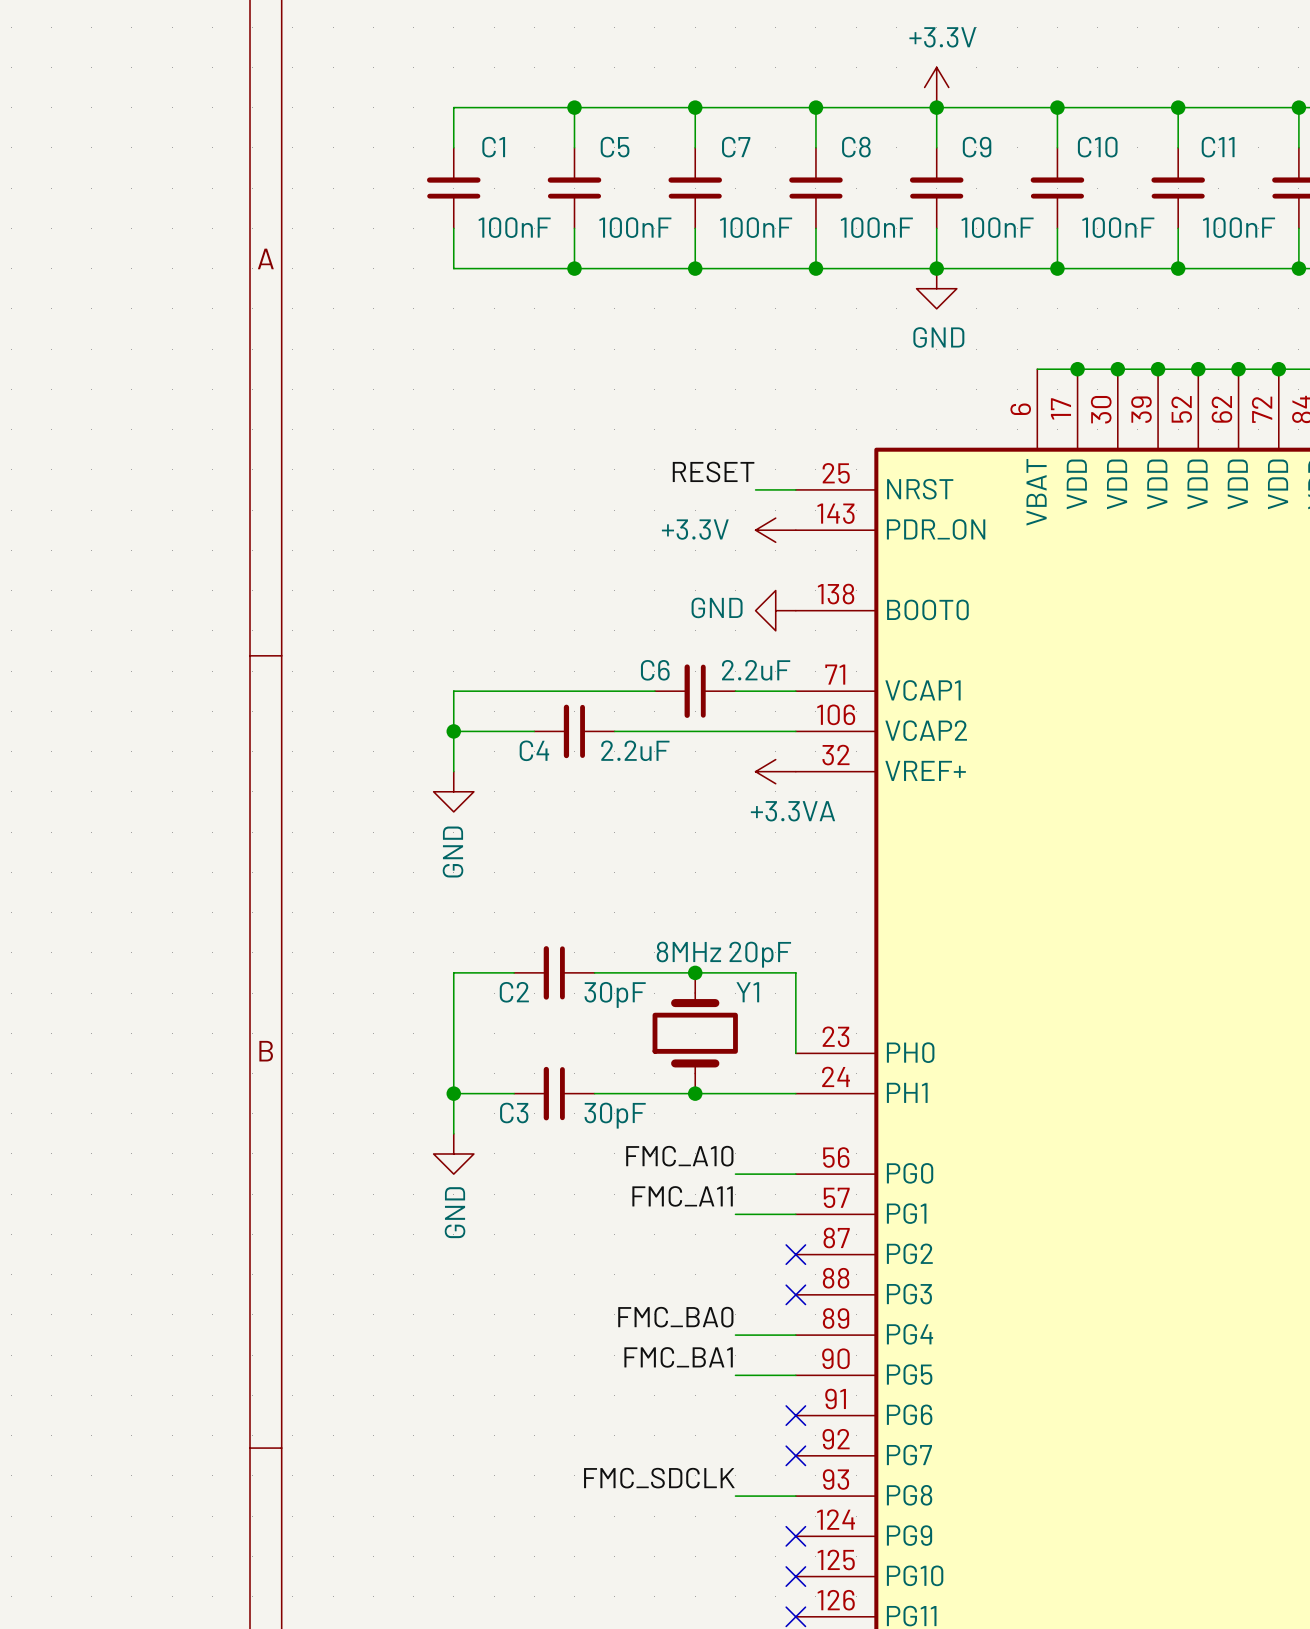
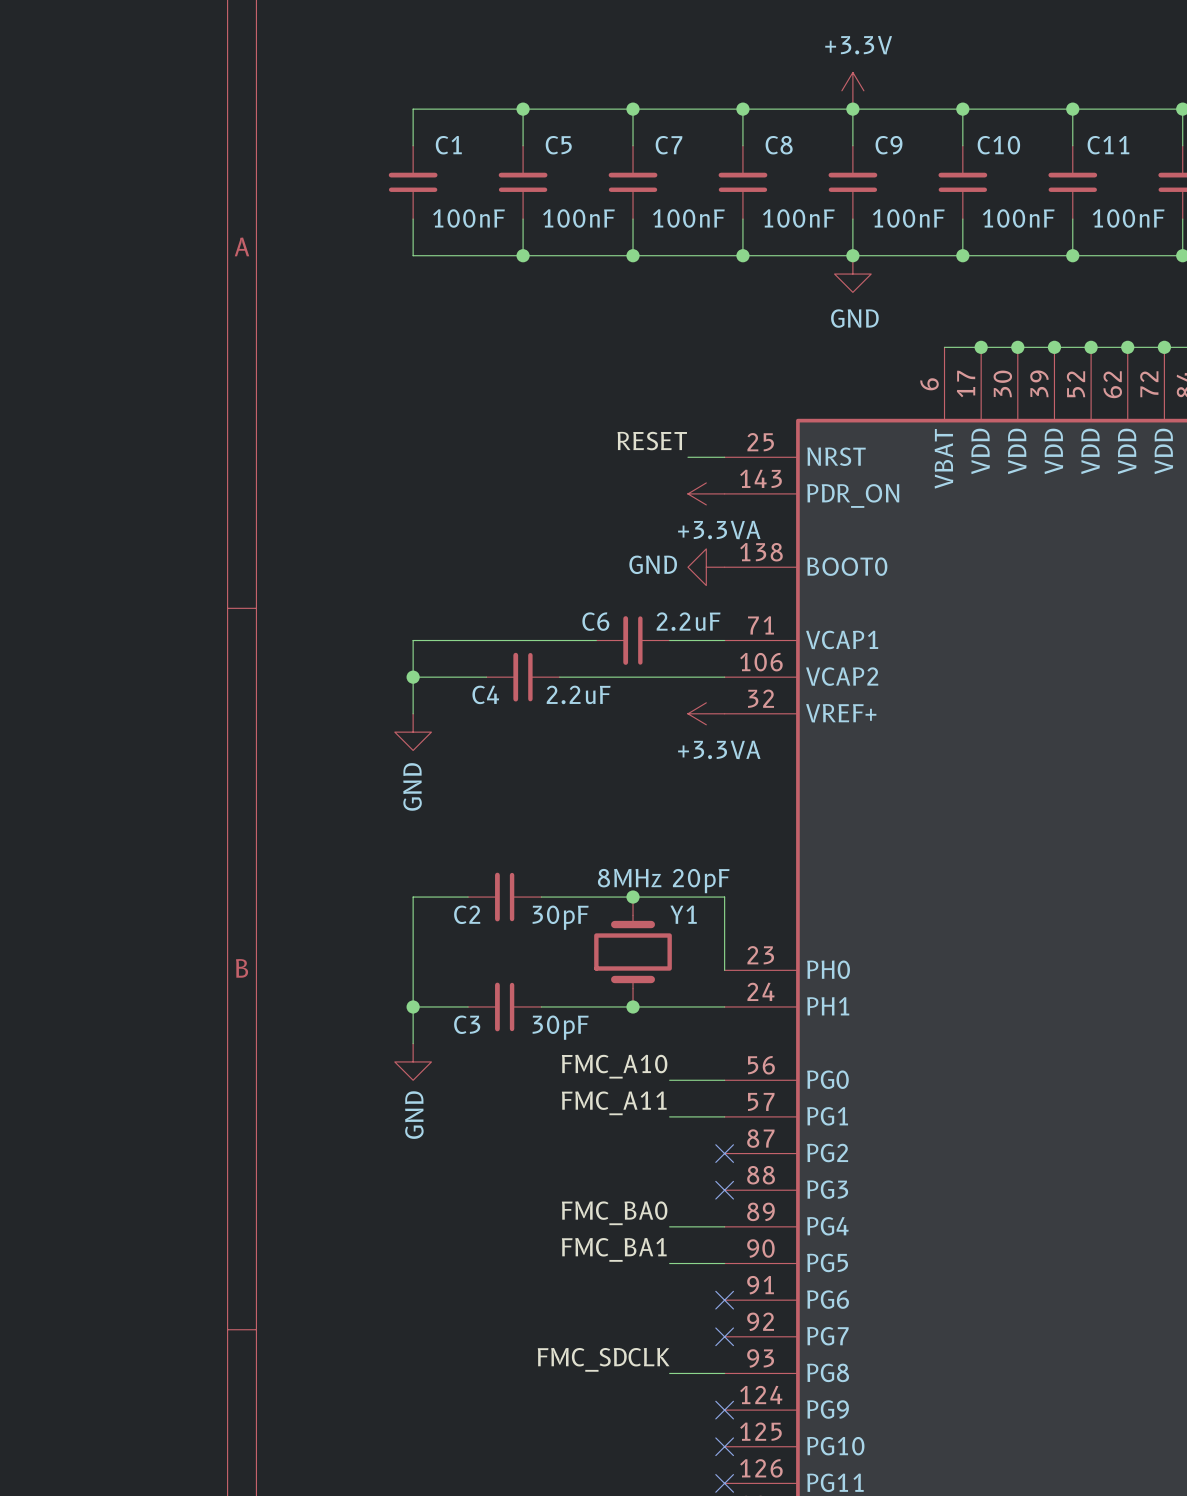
power symbol: +3.3V (775, 530) -> +3.3VA (706, 493)

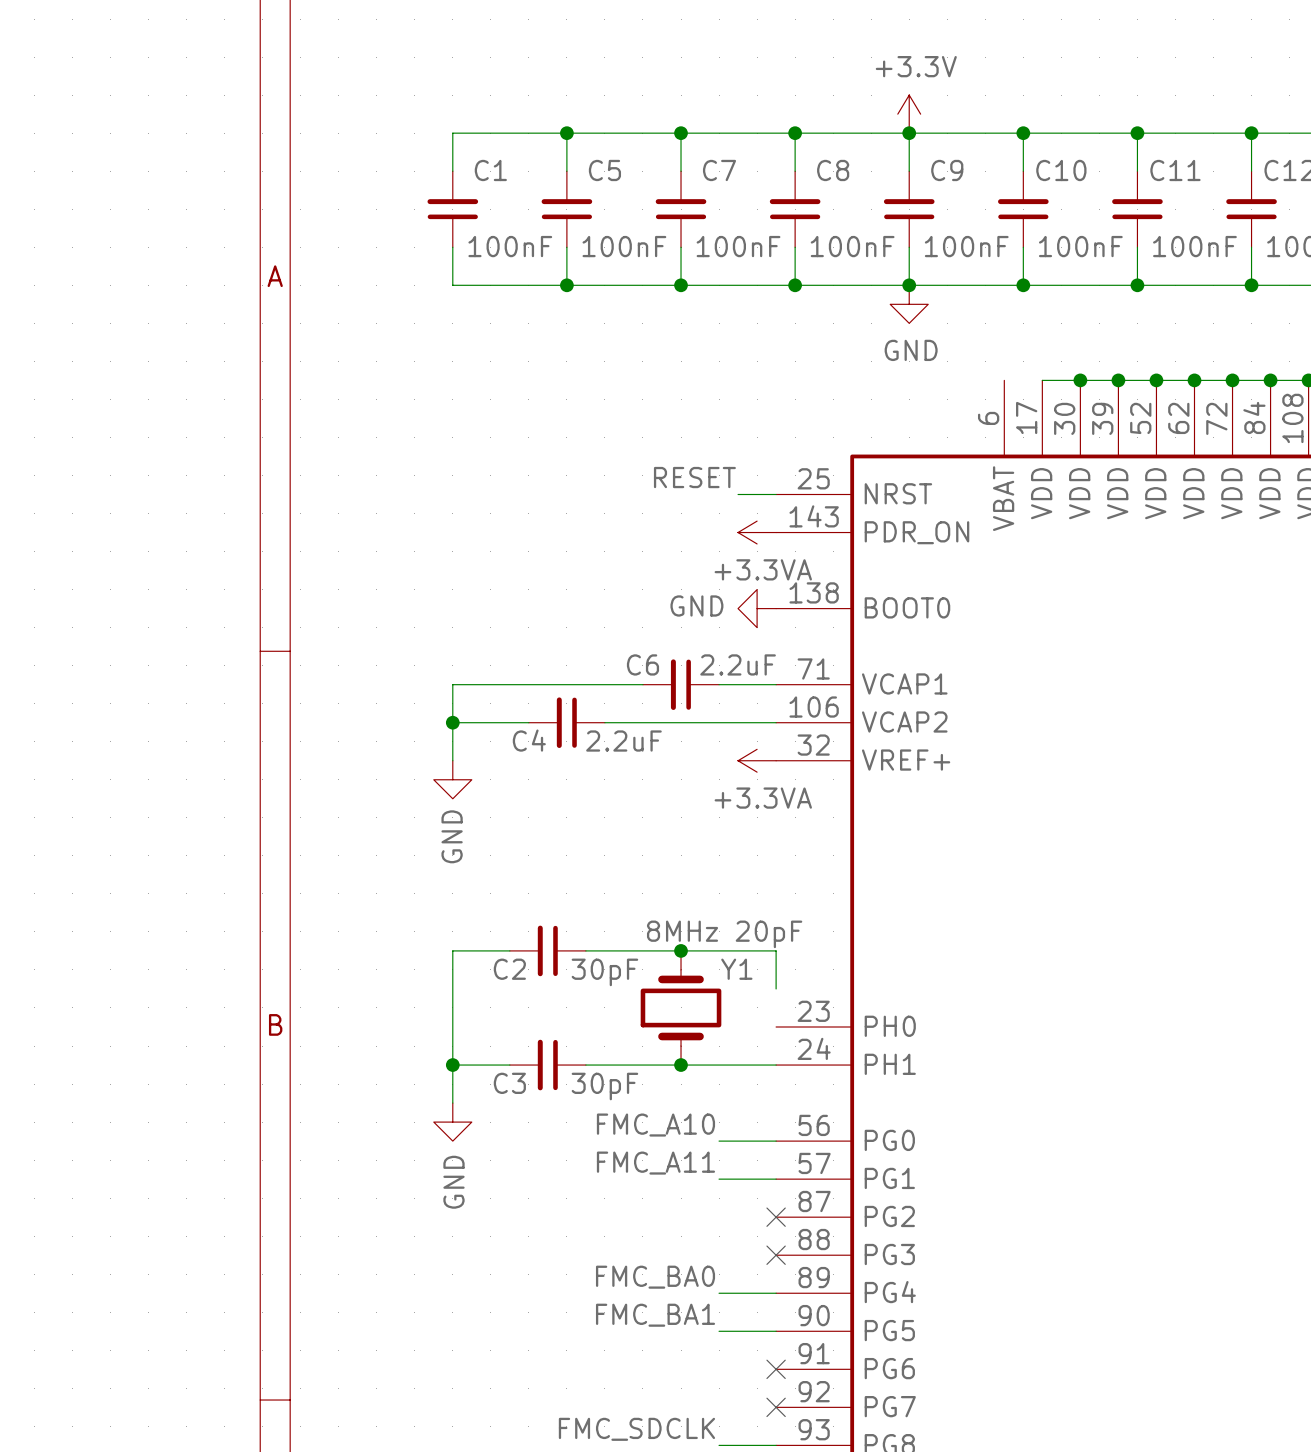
wire: (944, 347) (981, 347) -> none
junction: (981, 347) -> none
wire: (724, 933) (724, 970) -> none

